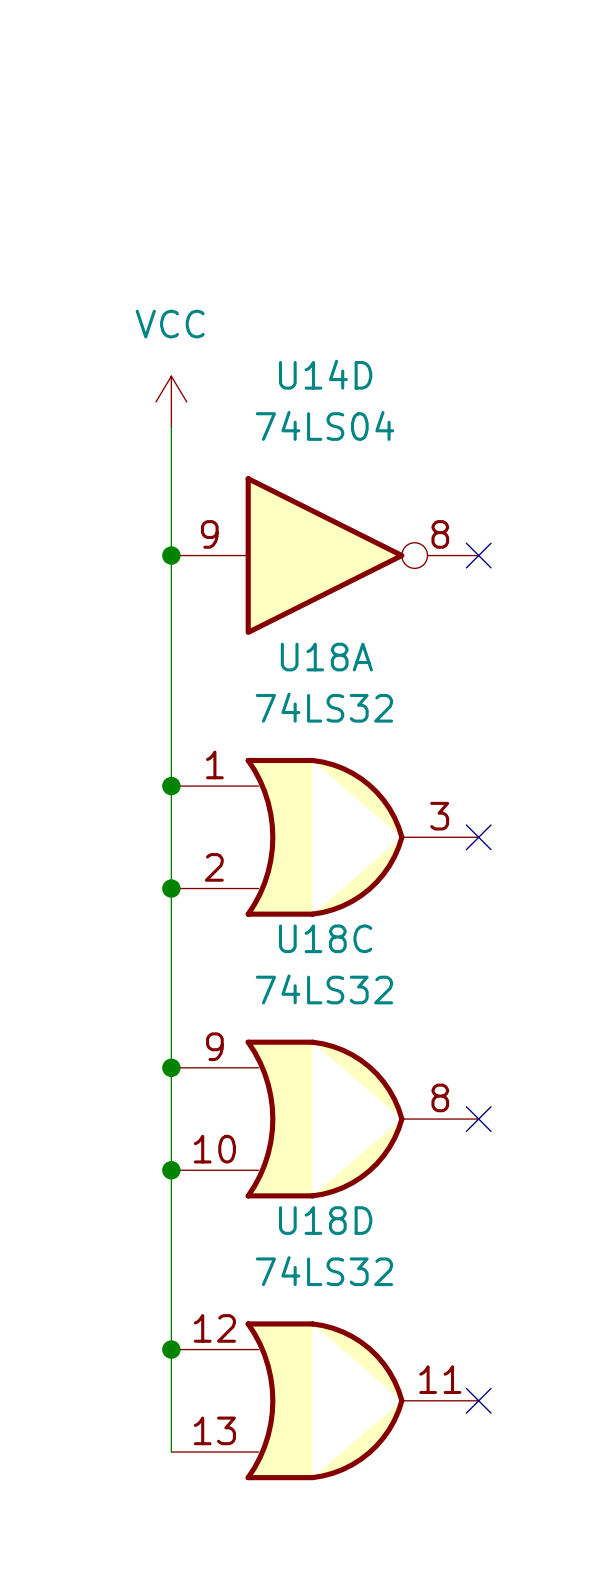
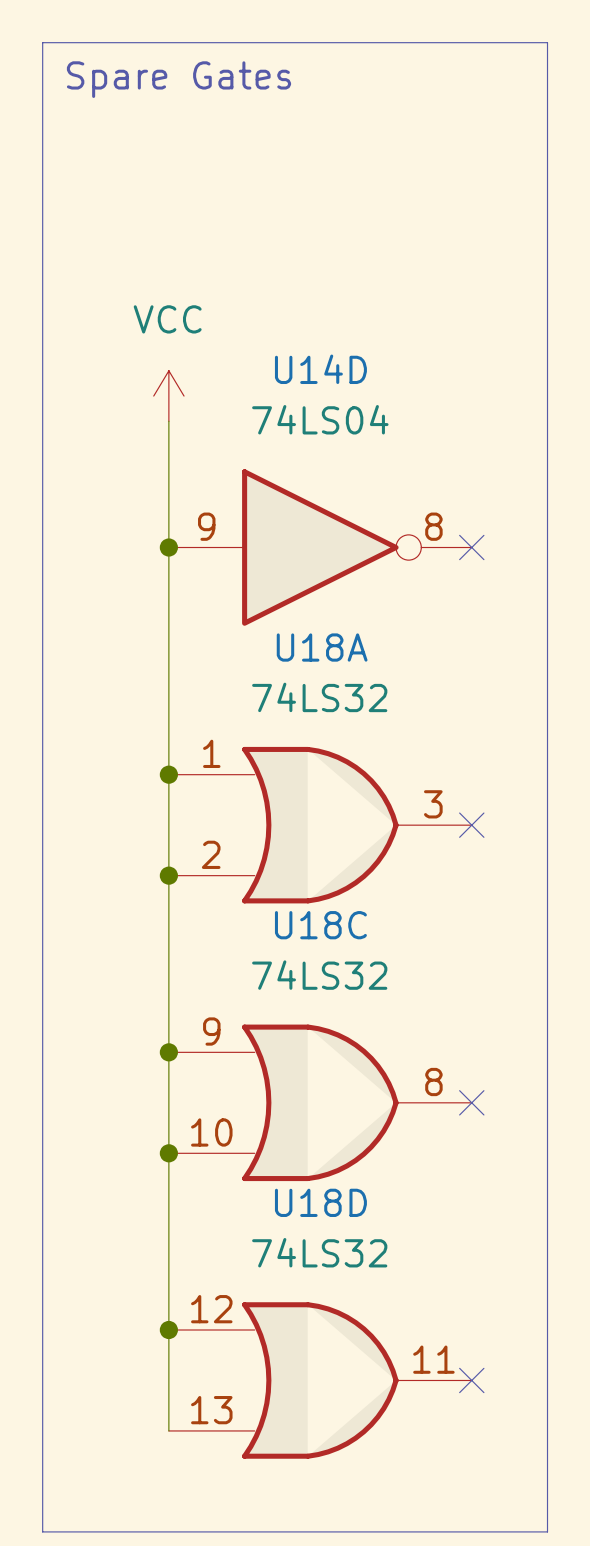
line: none -> (42, 42) (547, 42) (547, 1531) (42, 1531) (42, 42)
text: none -> Spare Gates (178, 79)

